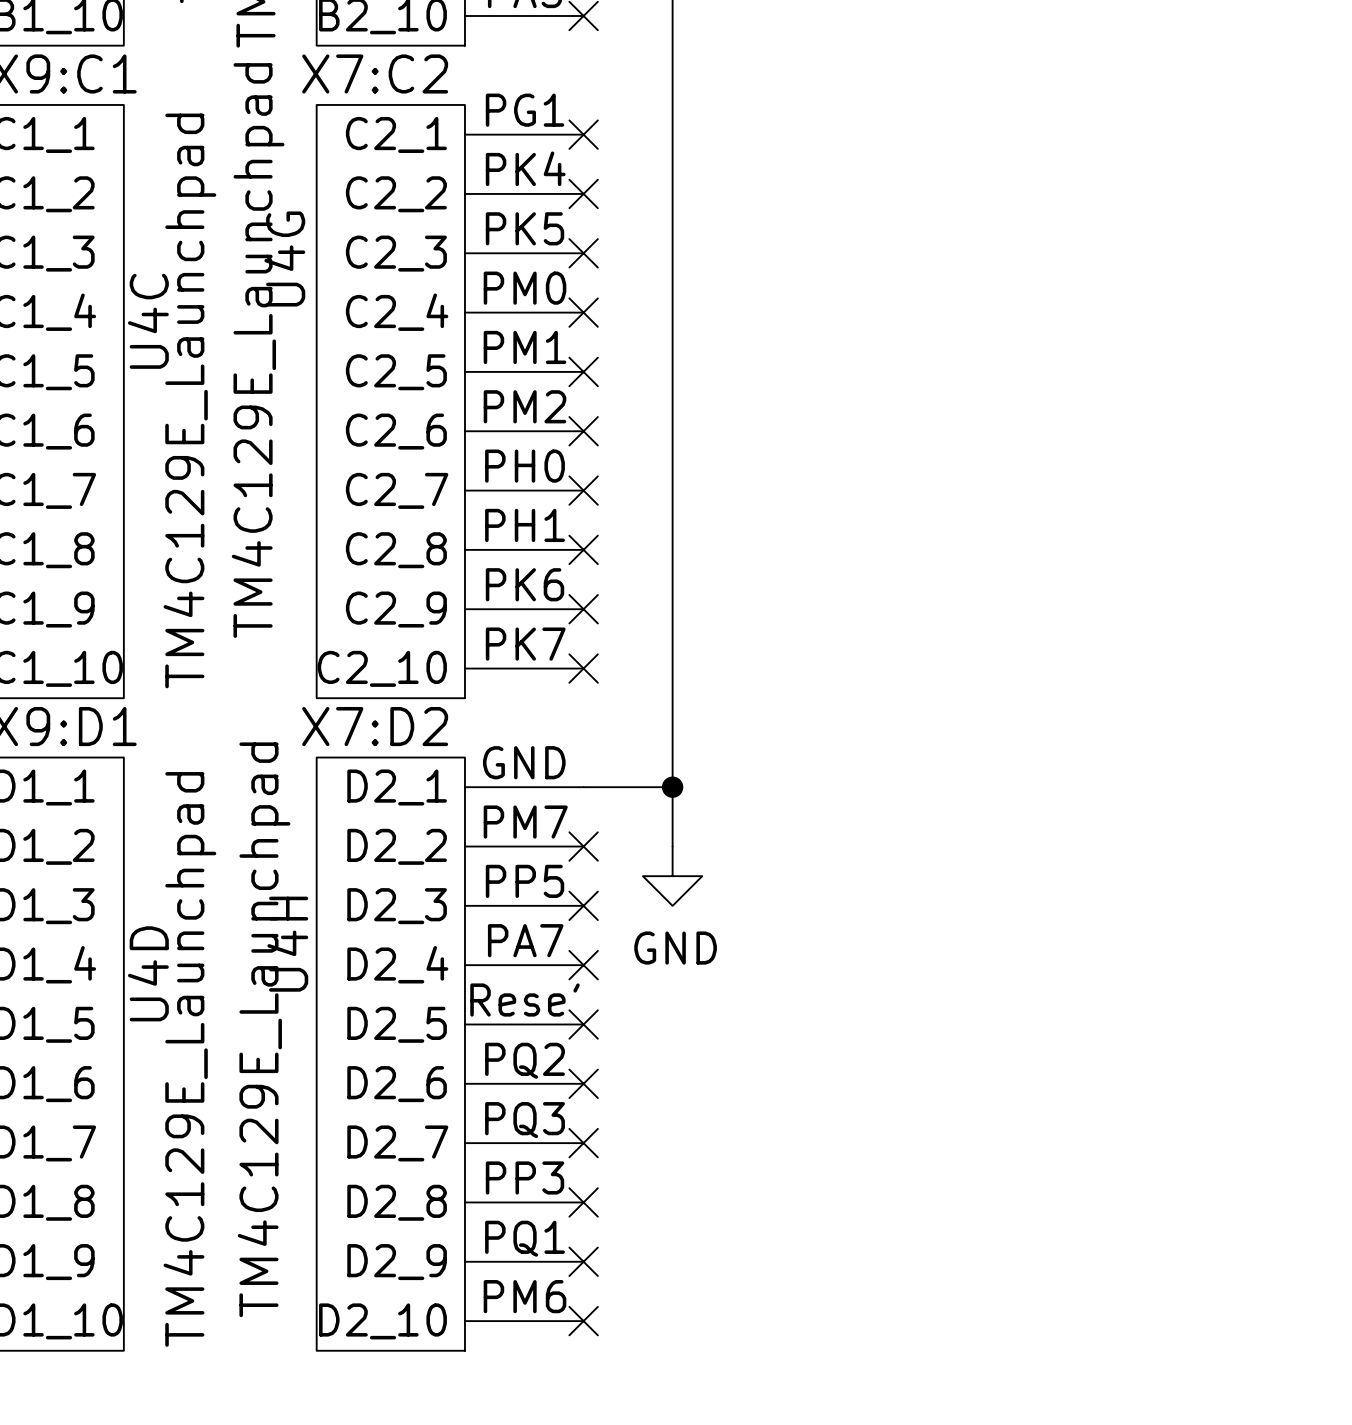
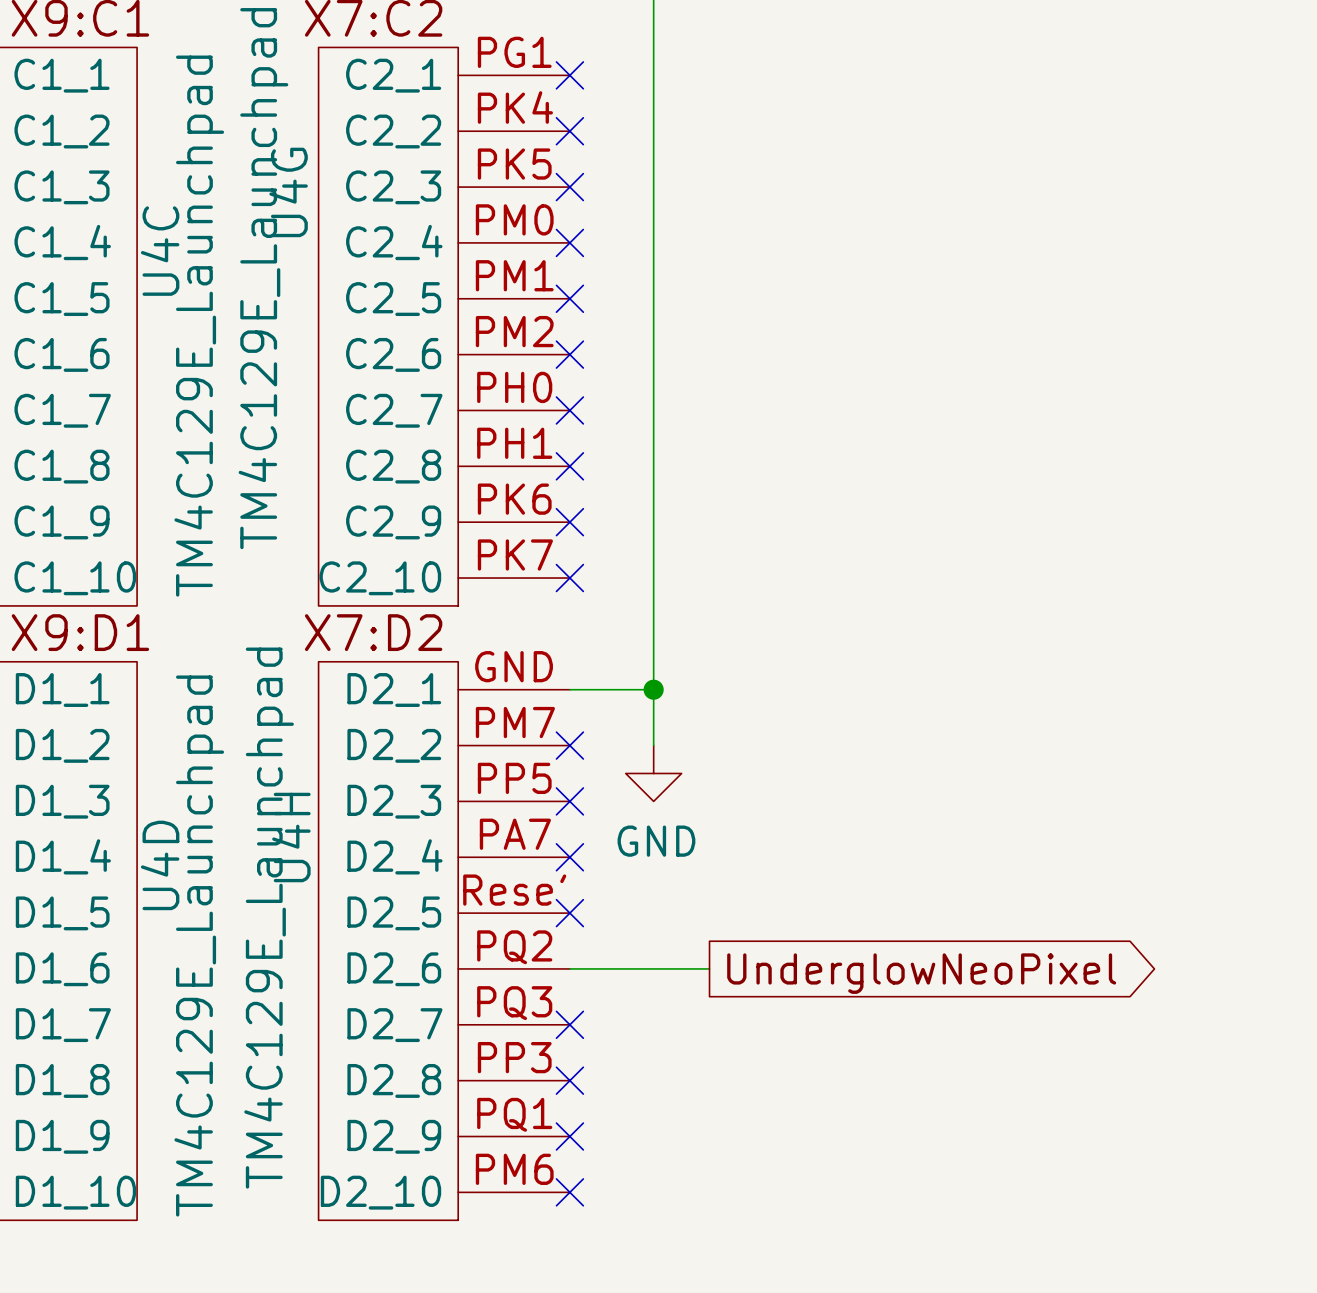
wire: none -> (569, 968) (709, 968)
no-connect mark: (583, 1083) -> none
global label: none -> UnderglowNeoPixel (921, 973)

